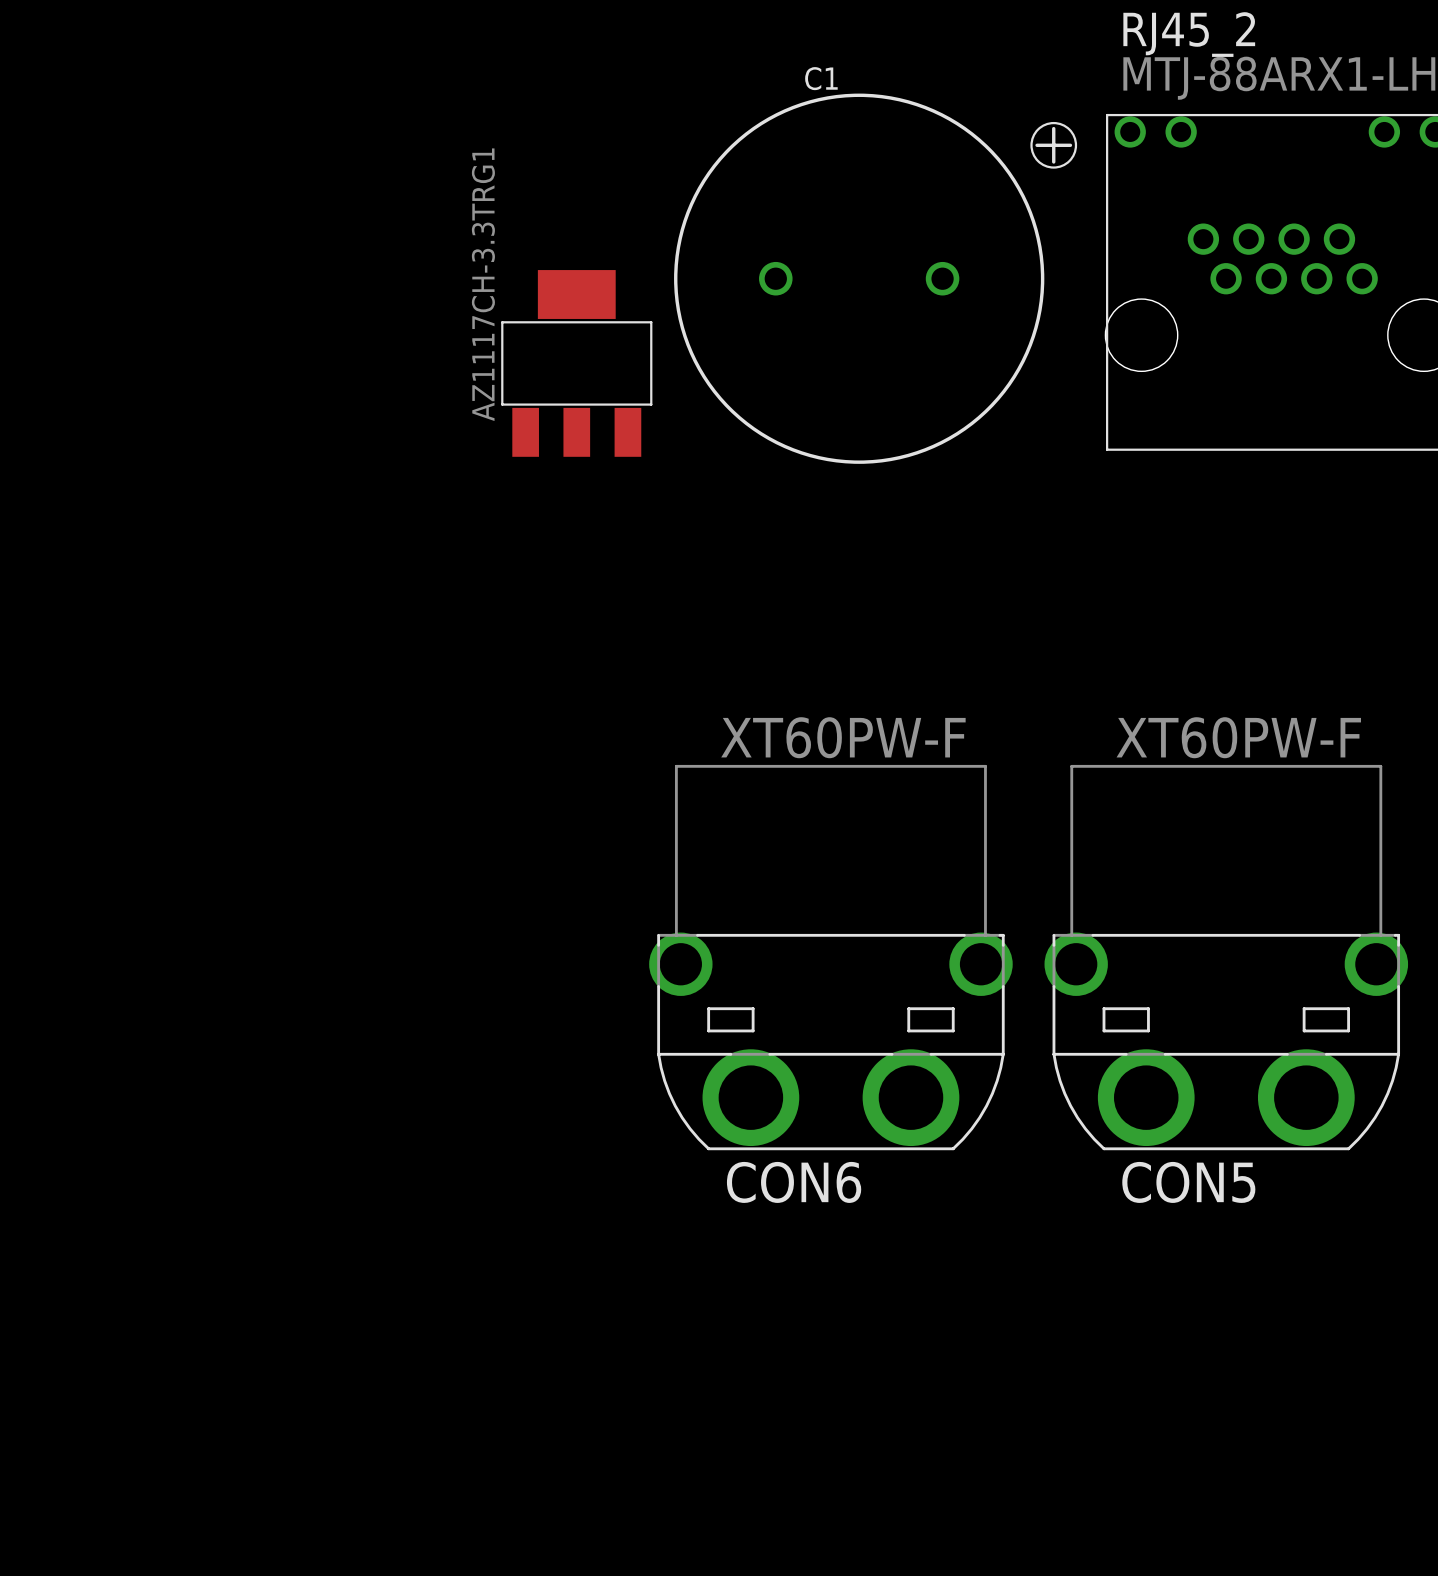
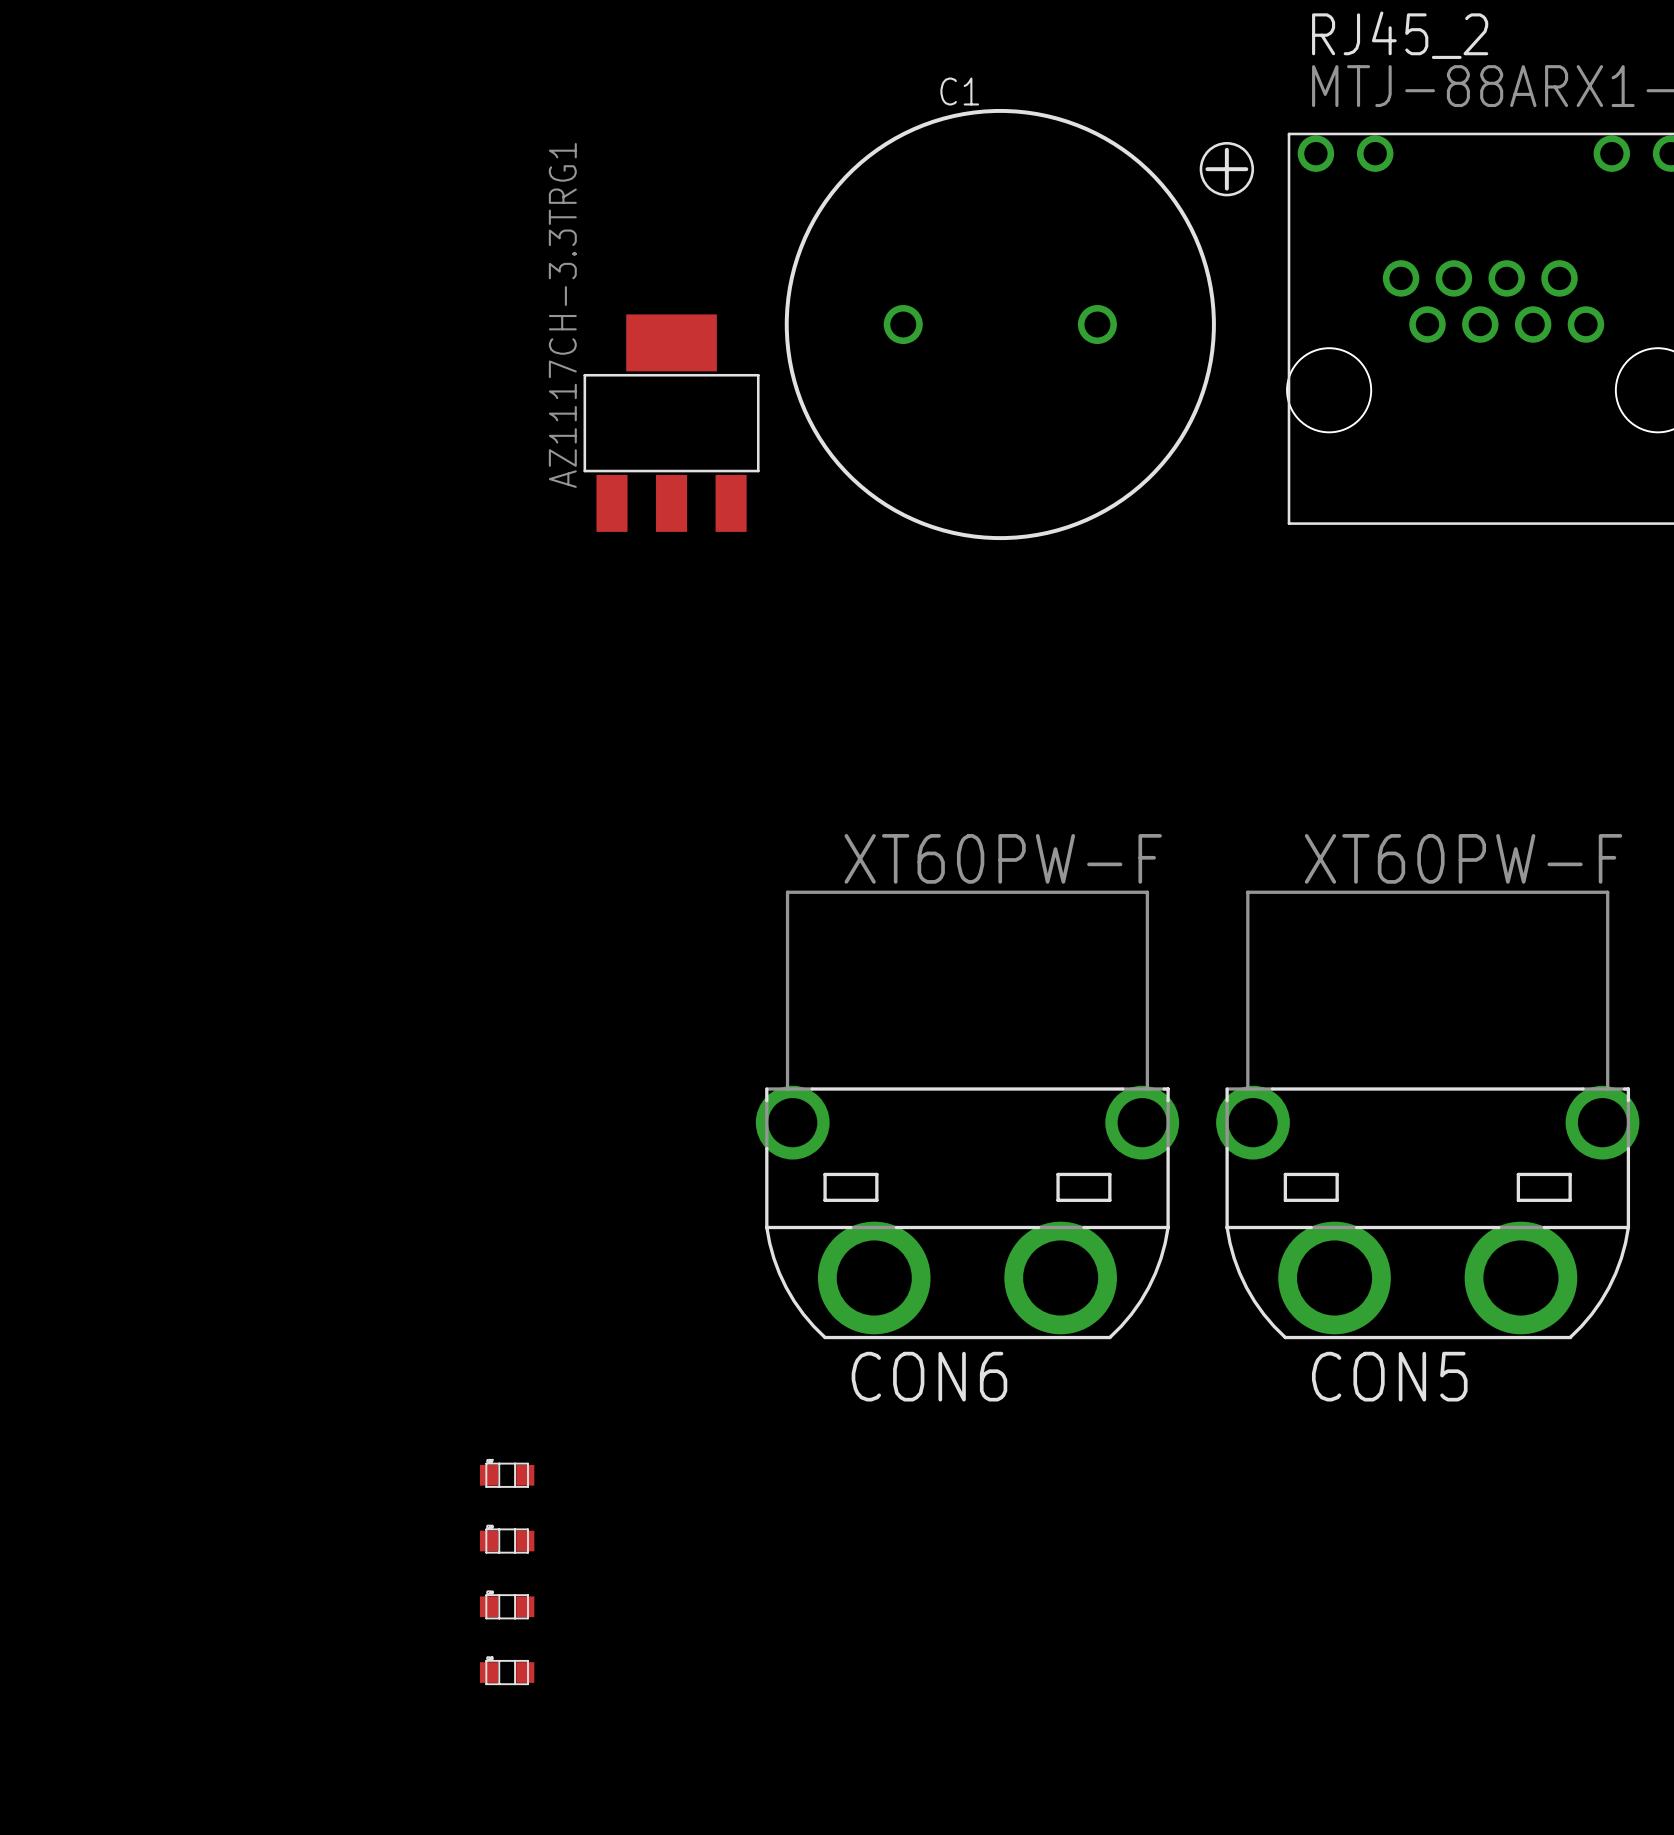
part: none -> (507, 1475)
part: none -> (507, 1541)
part: none -> (507, 1606)
part: none -> (507, 1672)

